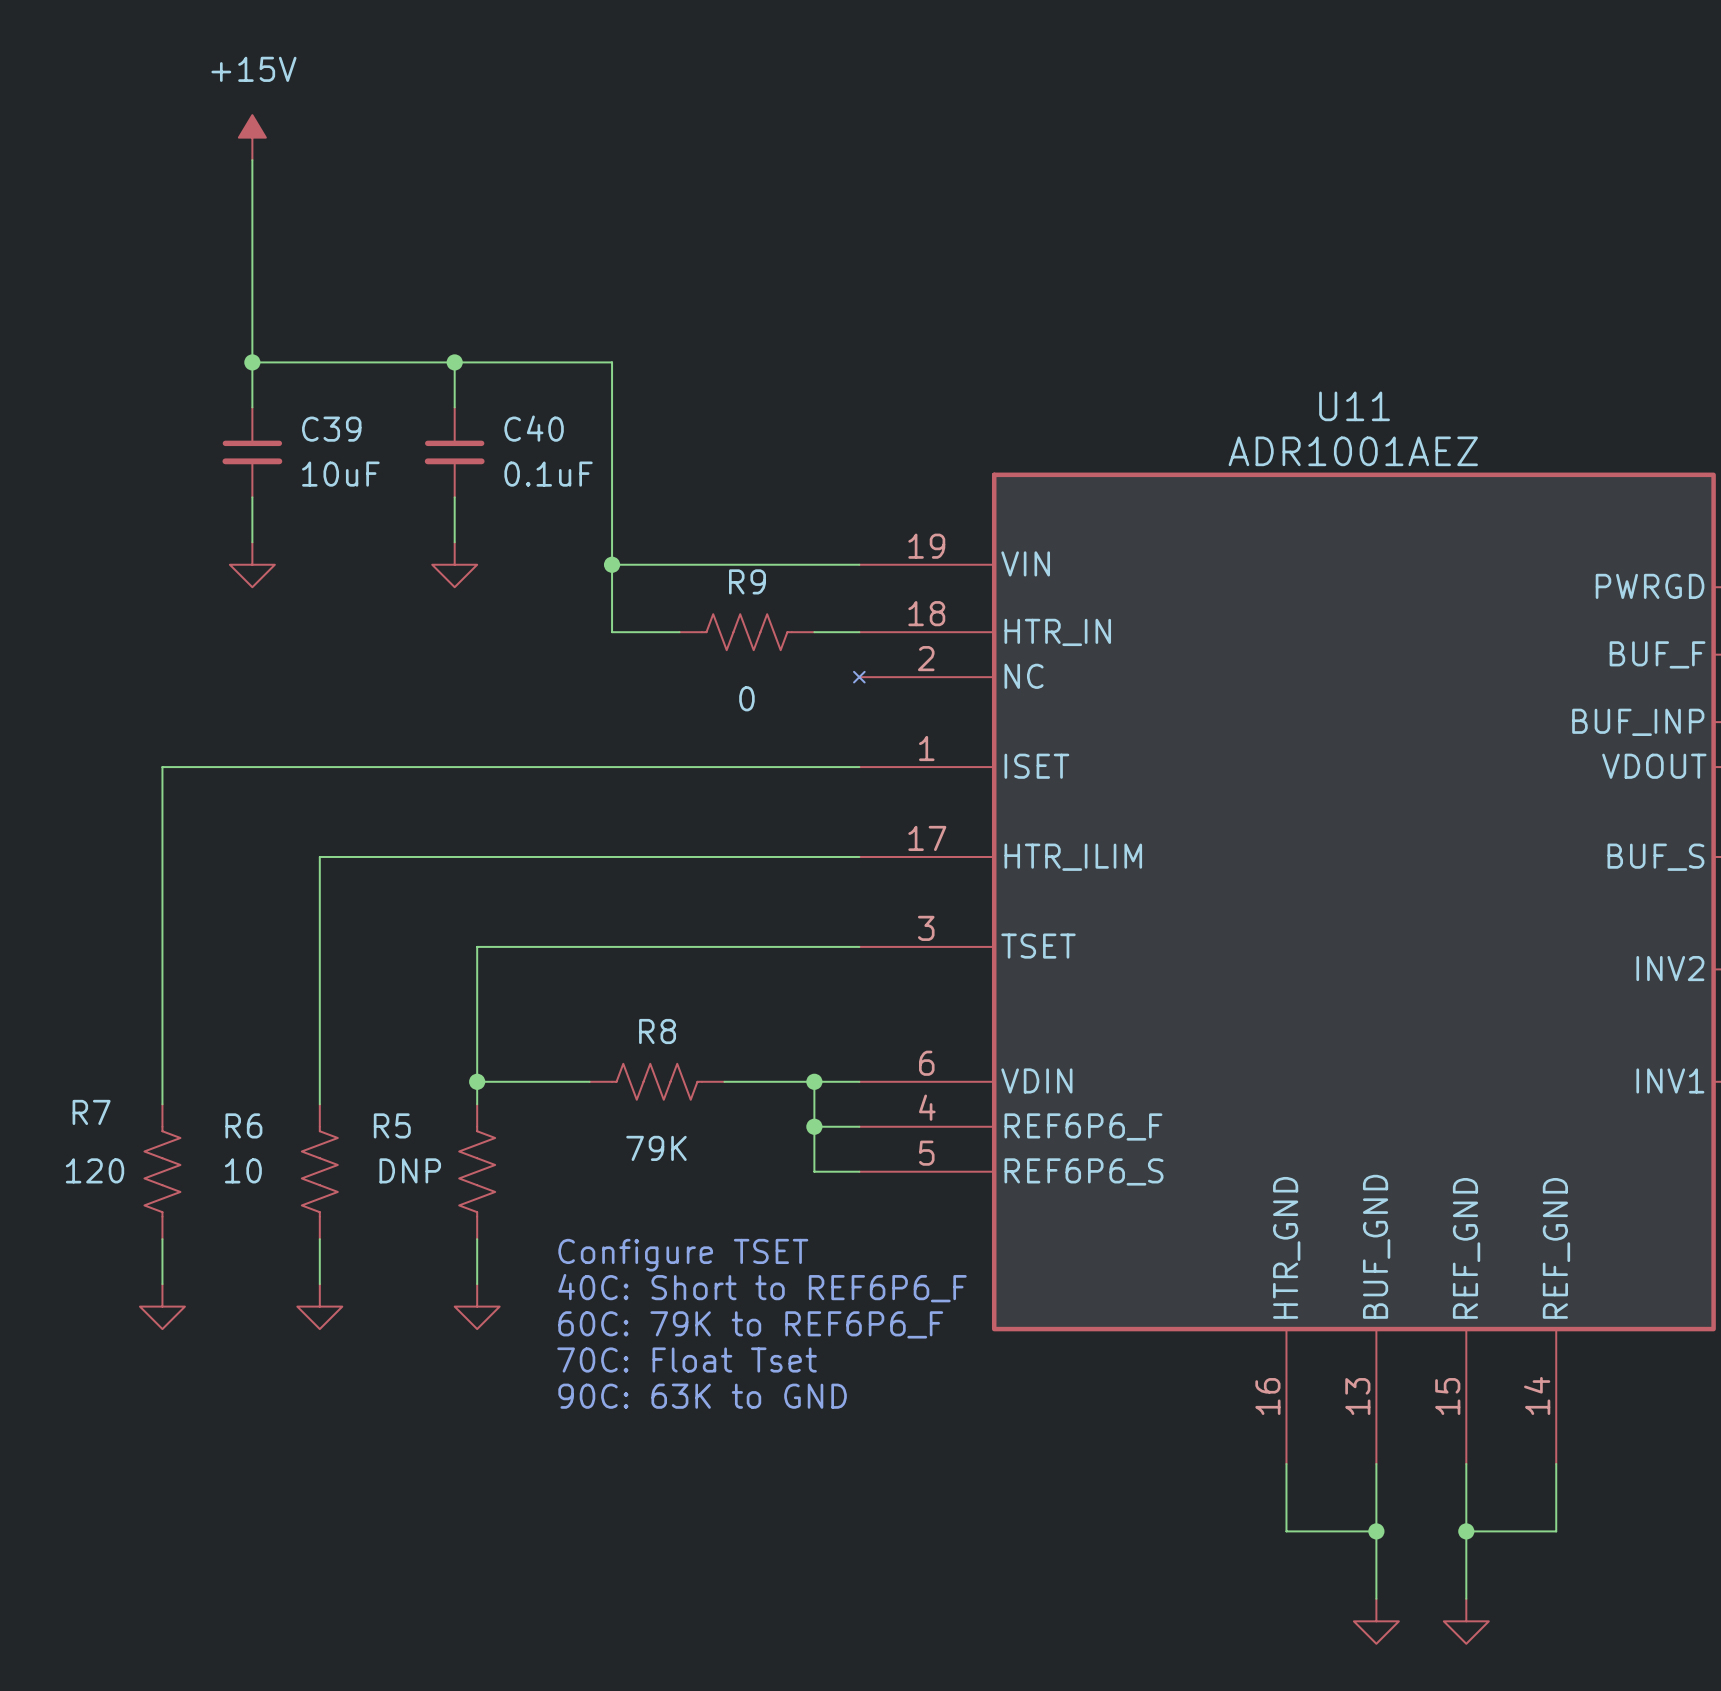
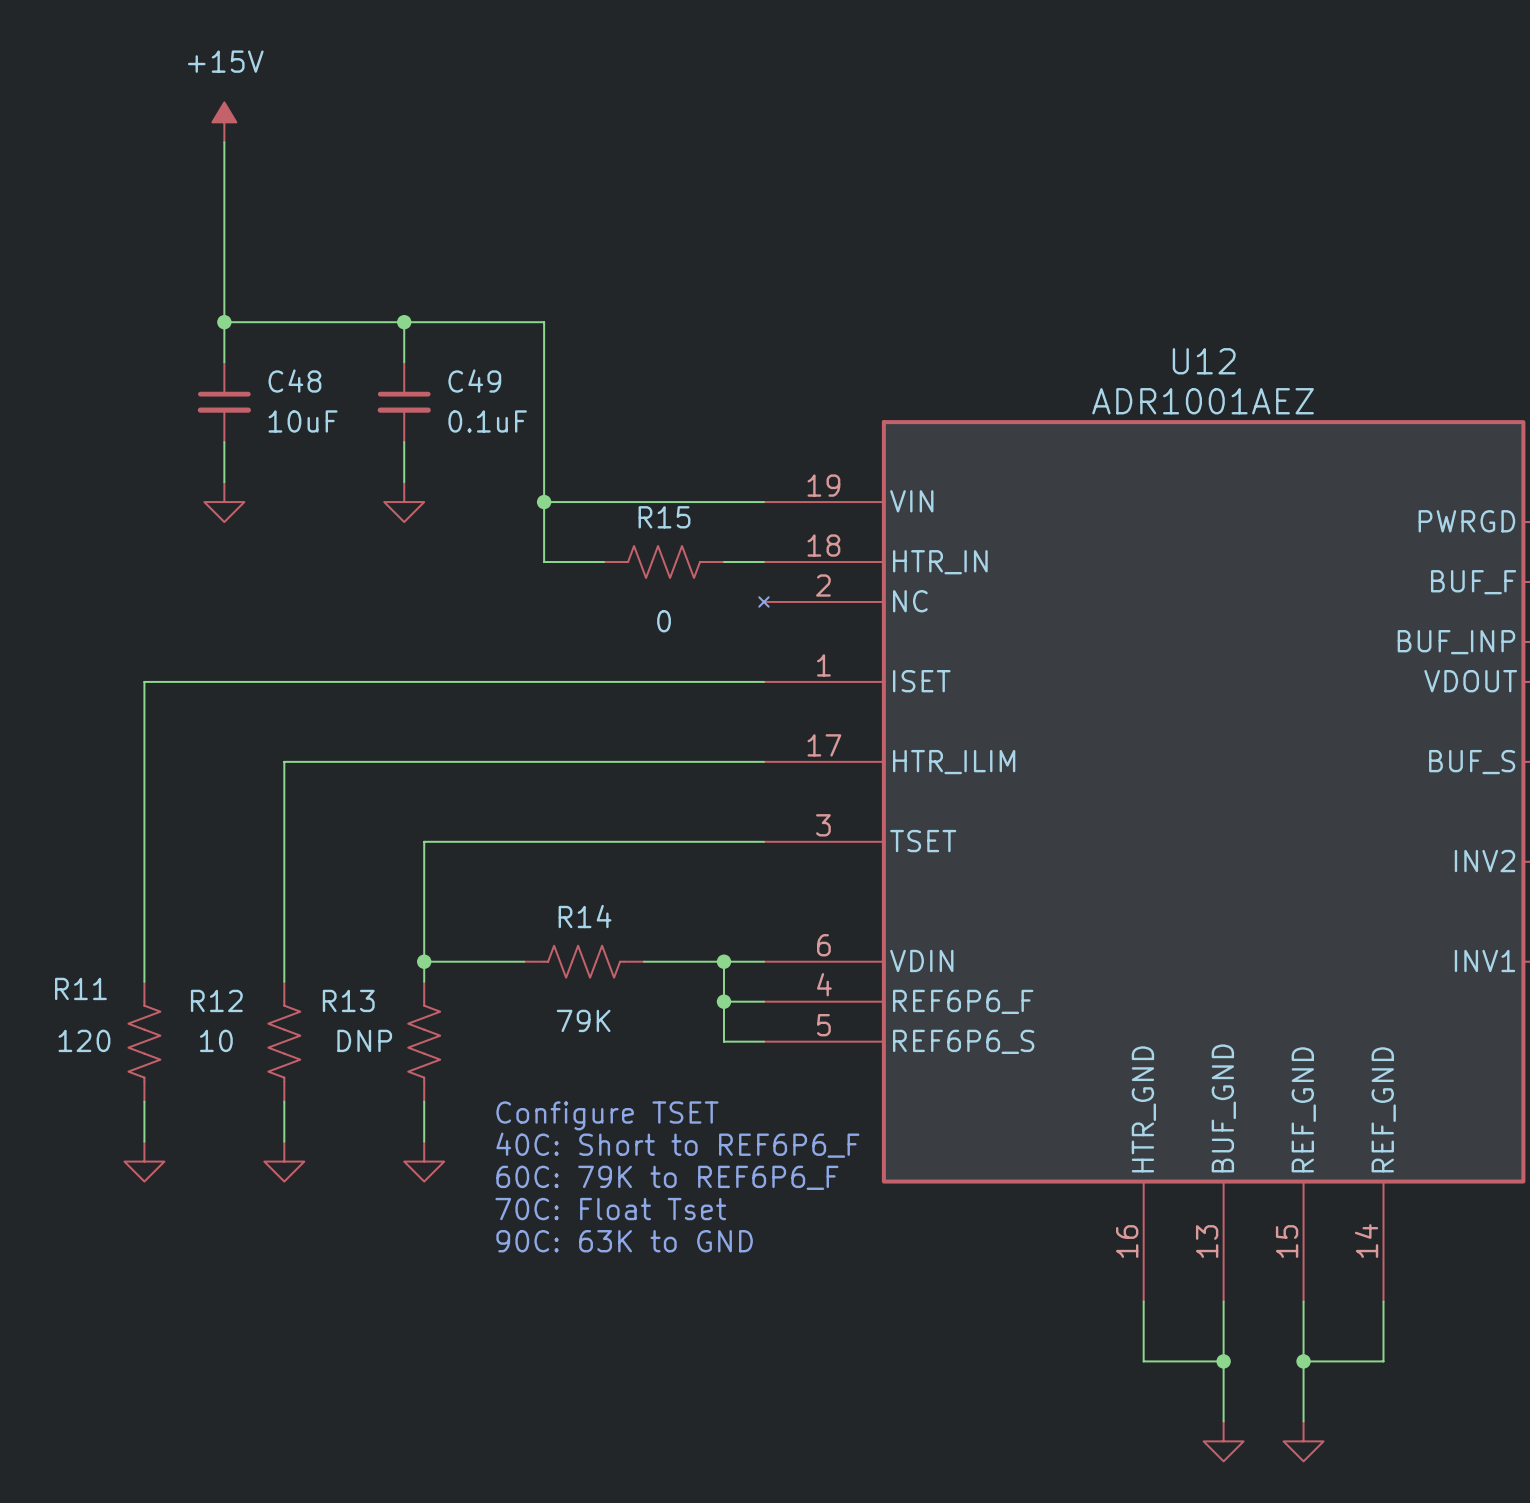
U11 name: U11 (1354, 406) -> U12 (1204, 361)
C40 name: C40 (534, 428) -> C49 (474, 381)
C39 name: C39 (331, 429) -> C48 (294, 381)
R9 name: R9 (747, 581) -> R15 (664, 517)
R8 name: R8 (657, 1031) -> R14 (585, 916)
R7 name: R7 (91, 1112) -> R11 (80, 988)
R6 name: R6 (243, 1125) -> R12 (216, 1000)
R5 name: R5 (392, 1125) -> R13 (348, 1000)

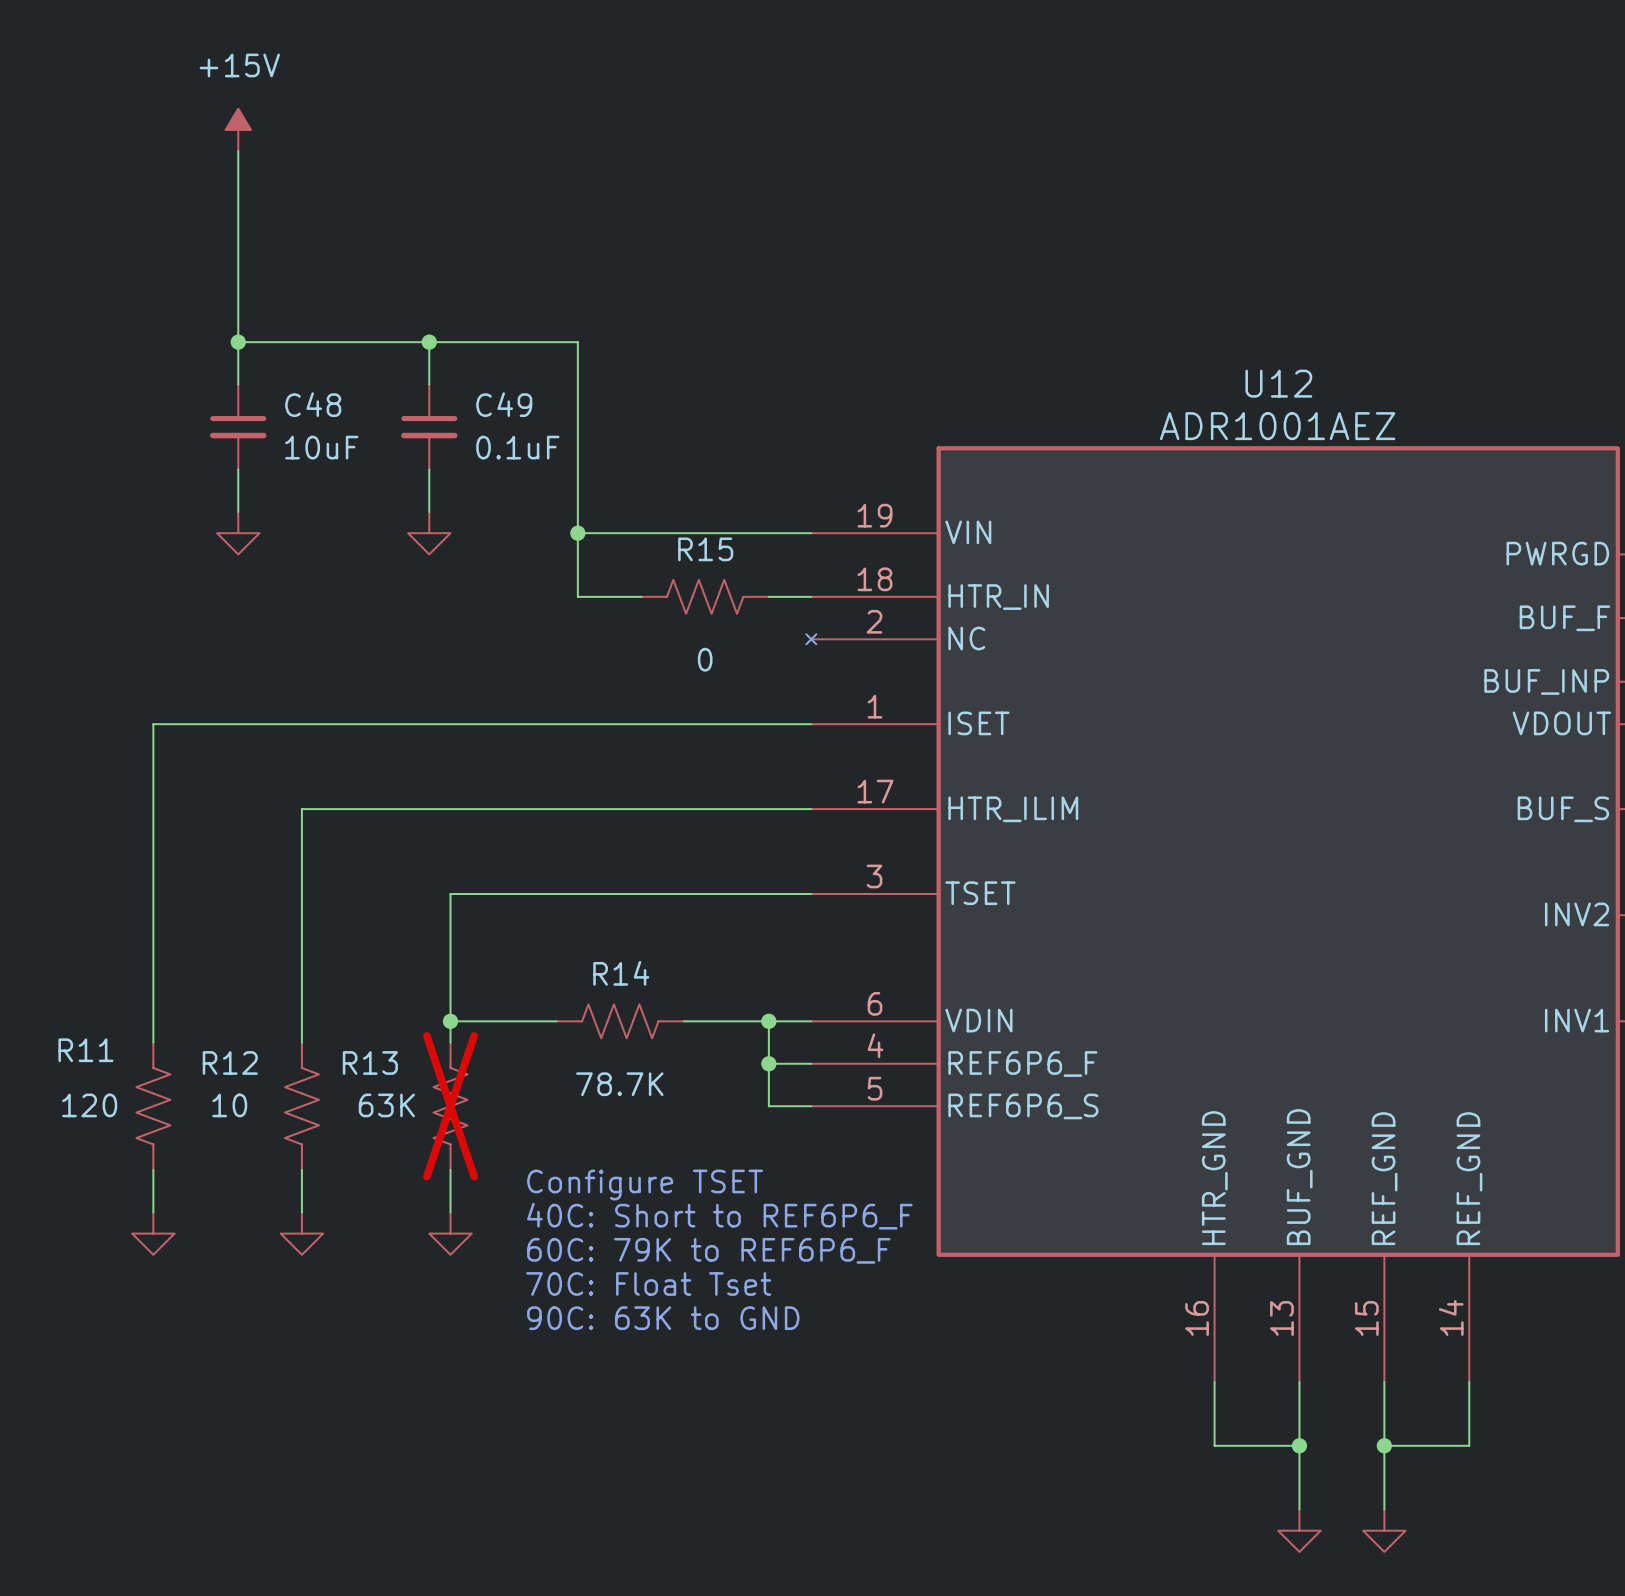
R14 value: 79K (583, 1020) -> 78.7K (619, 1084)
R13 value: DNP (364, 1040) -> 63K (386, 1105)
R13 do-not-place cross: none -> (450, 1106)

